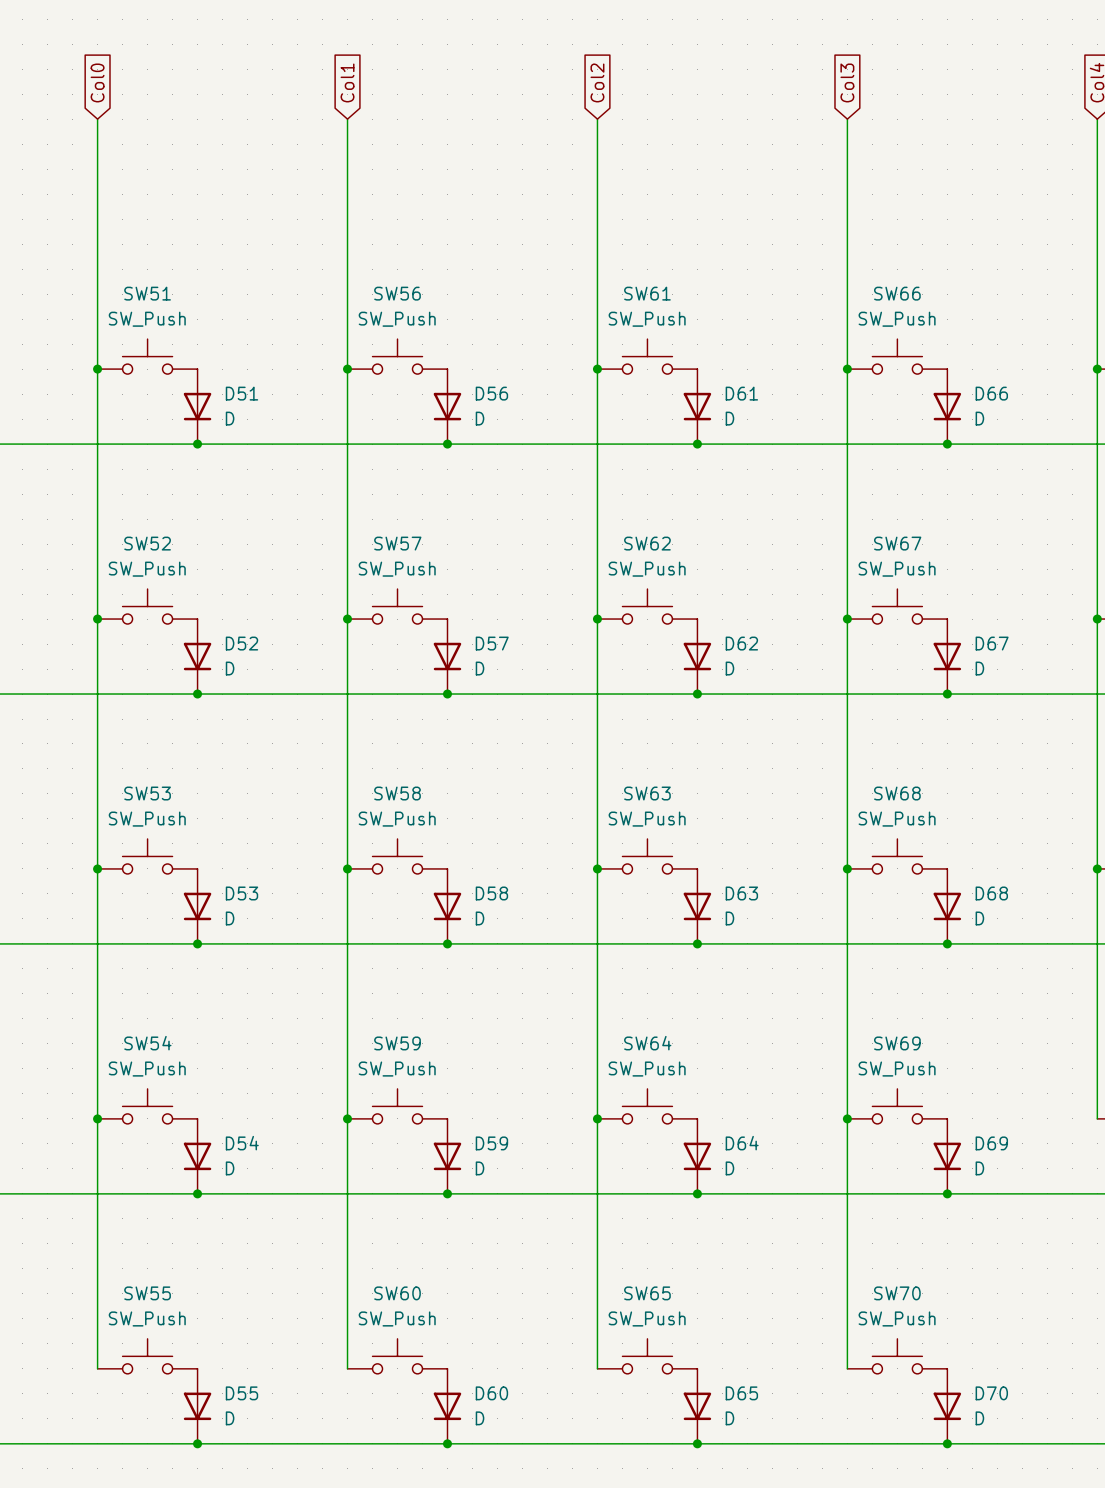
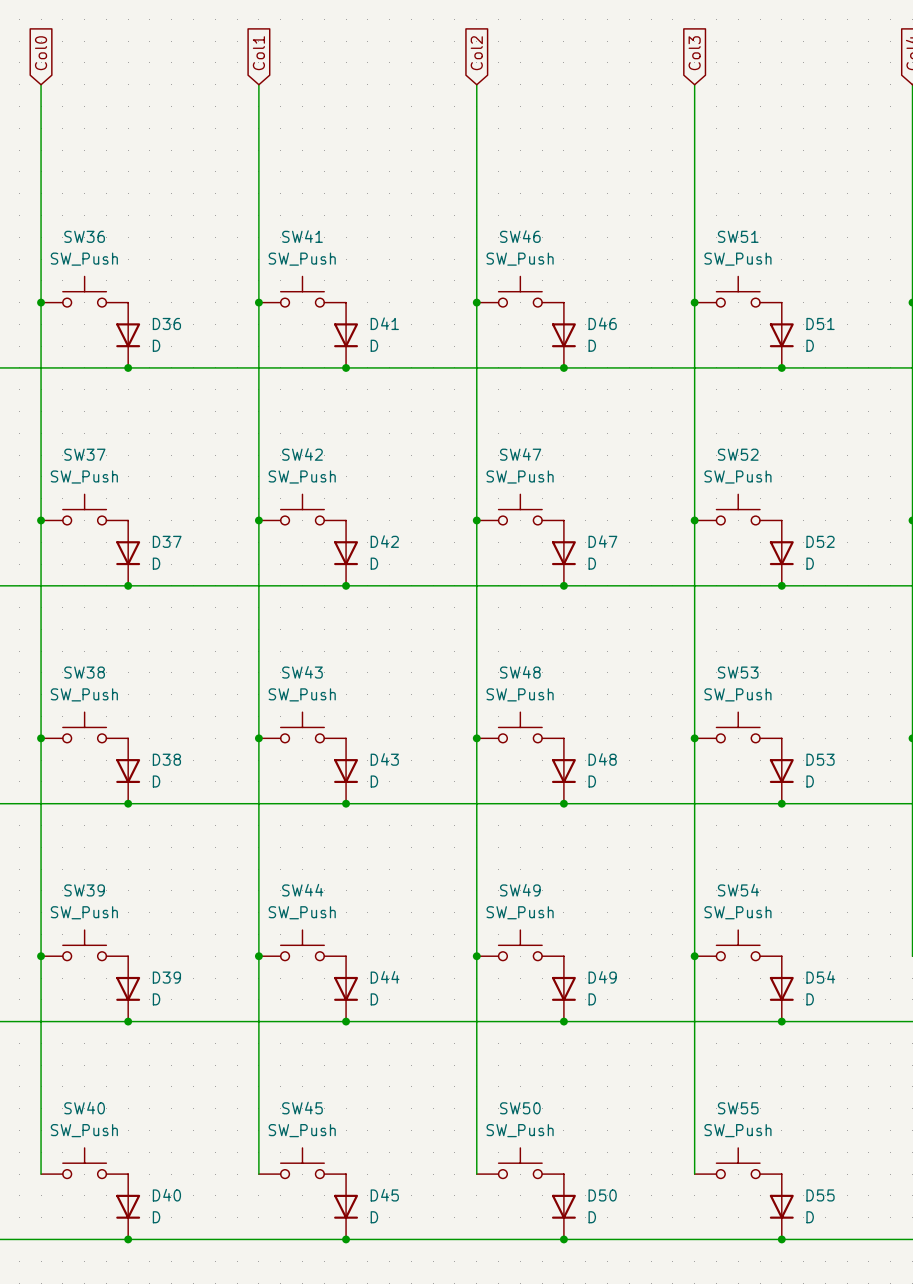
SW51 name: SW51 (147, 293) -> SW36 (84, 236)
SW56 name: SW56 (397, 293) -> SW41 (302, 236)
SW61 name: SW61 (647, 293) -> SW46 (520, 236)
SW66 name: SW66 (897, 293) -> SW51 (738, 236)
D51 name: D51 (241, 393) -> D36 (166, 323)
D56 name: D56 (491, 393) -> D41 (384, 323)
D61 name: D61 (741, 393) -> D46 (602, 323)
D66 name: D66 (991, 393) -> D51 (820, 323)
SW52 name: SW52 (147, 543) -> SW37 (84, 454)
SW57 name: SW57 (397, 543) -> SW42 (302, 454)
SW62 name: SW62 (647, 543) -> SW47 (520, 454)
SW67 name: SW67 (897, 543) -> SW52 (738, 454)
D52 name: D52 (241, 643) -> D37 (167, 541)
D57 name: D57 (492, 643) -> D42 (384, 541)
D62 name: D62 (741, 643) -> D47 (602, 541)
D67 name: D67 (992, 643) -> D52 (820, 541)
SW53 name: SW53 (147, 793) -> SW38 (84, 672)
SW58 name: SW58 (397, 793) -> SW43 (302, 672)
SW63 name: SW63 (647, 793) -> SW48 (520, 672)
SW68 name: SW68 (897, 793) -> SW53 (738, 672)
D53 name: D53 (241, 893) -> D38 (166, 759)
D58 name: D58 (491, 893) -> D43 (384, 759)
D63 name: D63 (741, 893) -> D48 (602, 759)
D68 name: D68 (991, 893) -> D53 (820, 759)
SW54 name: SW54 (147, 1043) -> SW39 (84, 890)
SW59 name: SW59 (397, 1043) -> SW44 (302, 890)
SW64 name: SW64 (647, 1043) -> SW49 (520, 890)
SW69 name: SW69 (897, 1043) -> SW54 (738, 890)
D54 name: D54 (242, 1143) -> D39 (166, 977)
D59 name: D59 (491, 1143) -> D44 (385, 977)
D64 name: D64 (742, 1143) -> D49 (602, 977)
D69 name: D69 (991, 1143) -> D54 (820, 977)
SW55 name: SW55 (147, 1293) -> SW40 (84, 1108)
SW60 name: SW60 (397, 1293) -> SW45 (302, 1108)
SW65 name: SW65 (647, 1293) -> SW50 (520, 1108)
SW70 name: SW70 (897, 1293) -> SW55 (738, 1108)
D55 name: D55 (241, 1393) -> D40 (166, 1195)
D60 name: D60 (491, 1393) -> D45 (384, 1195)
D65 name: D65 (741, 1393) -> D50 (602, 1195)
D70 name: D70 (991, 1393) -> D55 (820, 1195)

